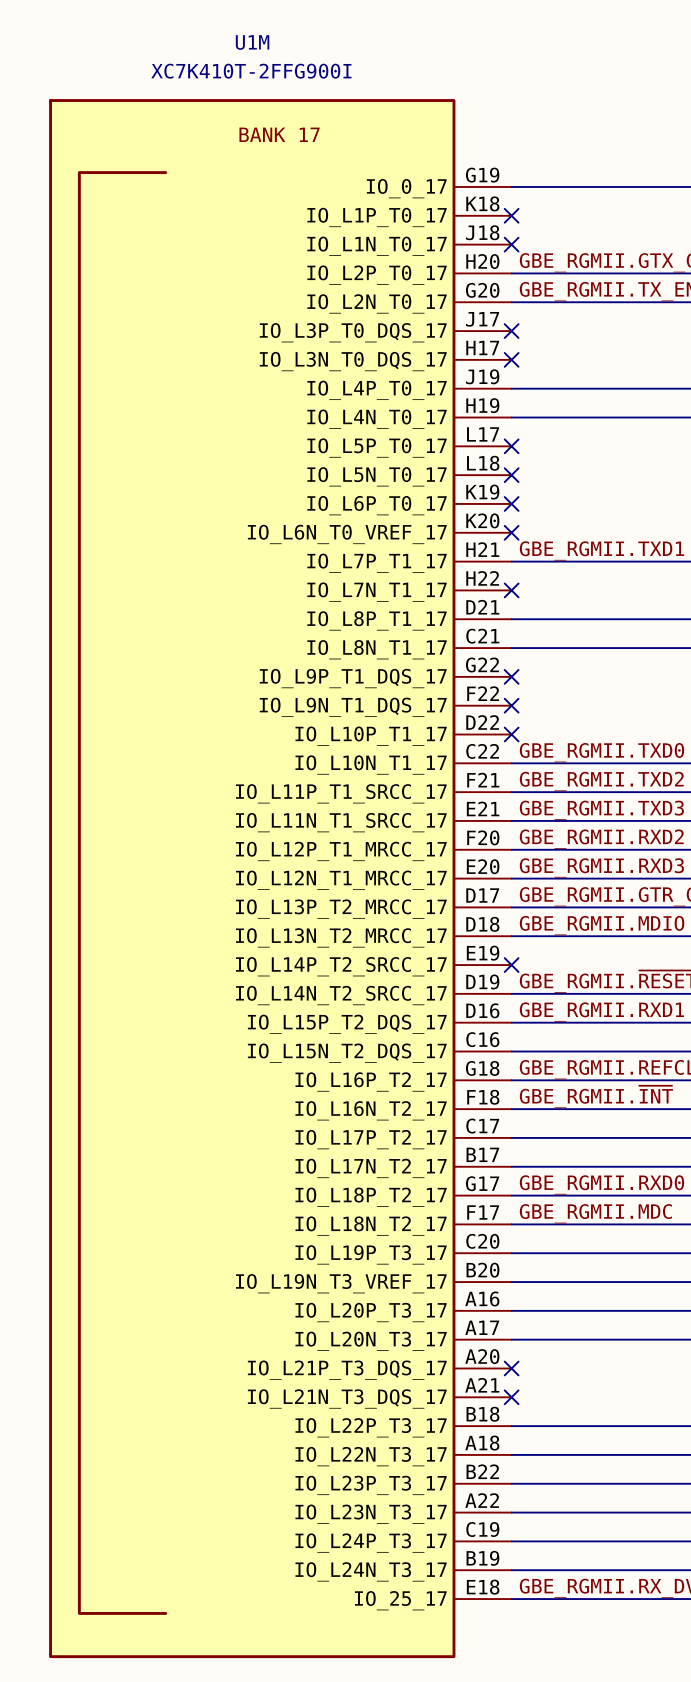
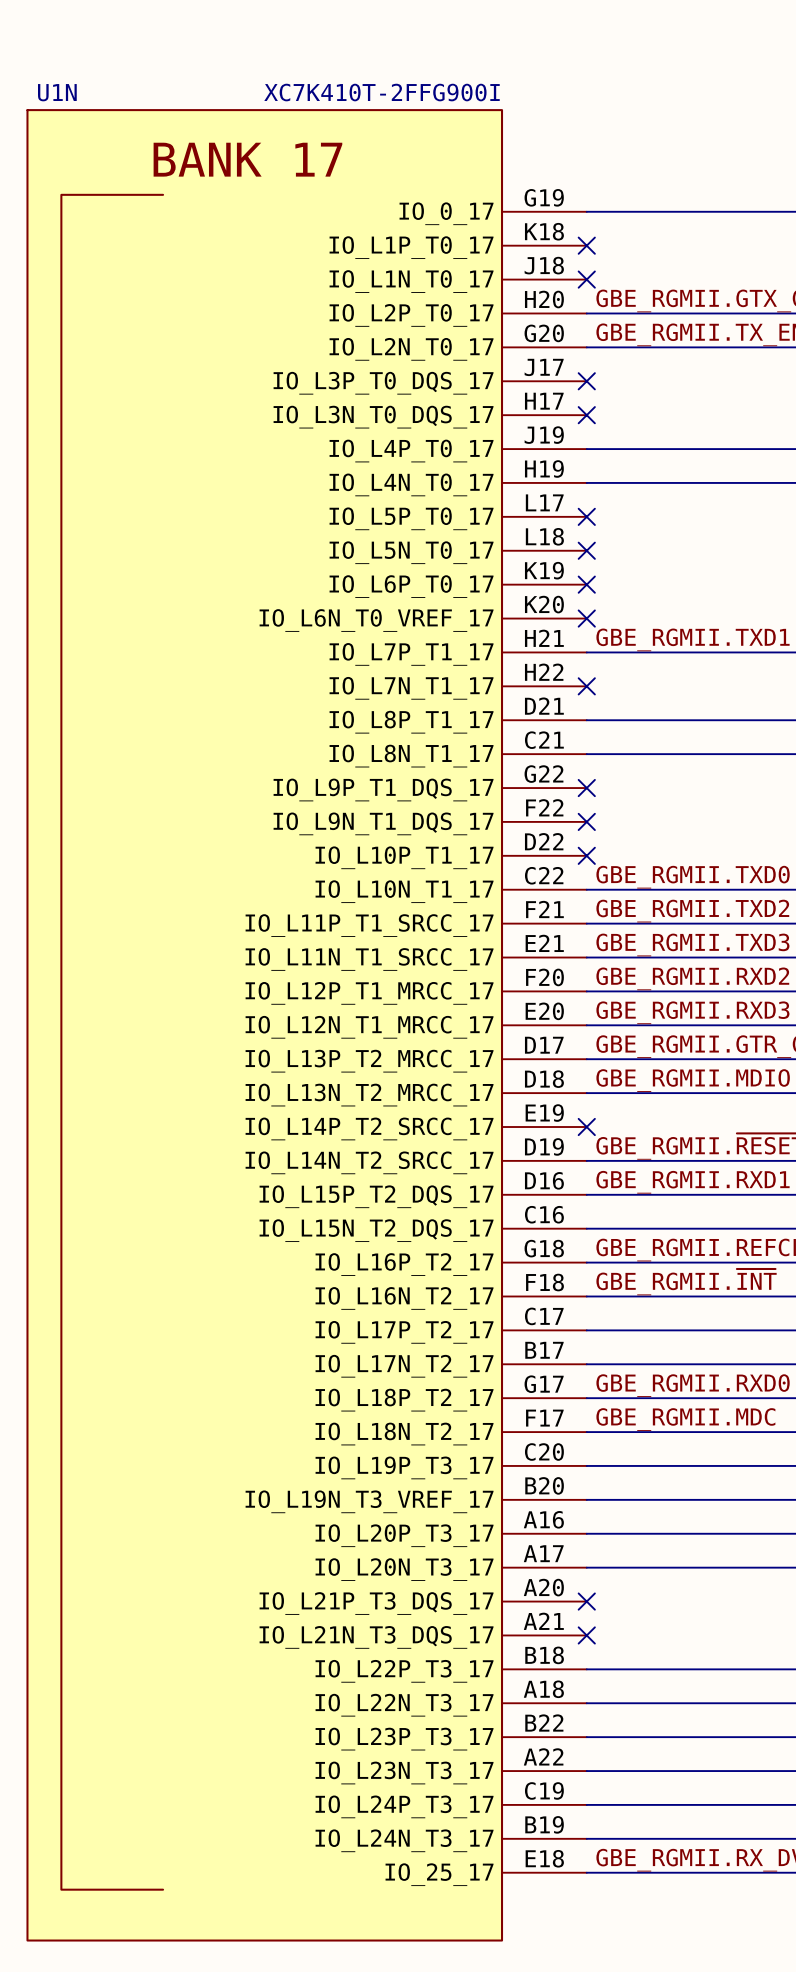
U1N: none -> XC7K410T-2FFG900I (306, 1025)
U1M: XC7K410T-2FFG900I (280, 878) -> none

